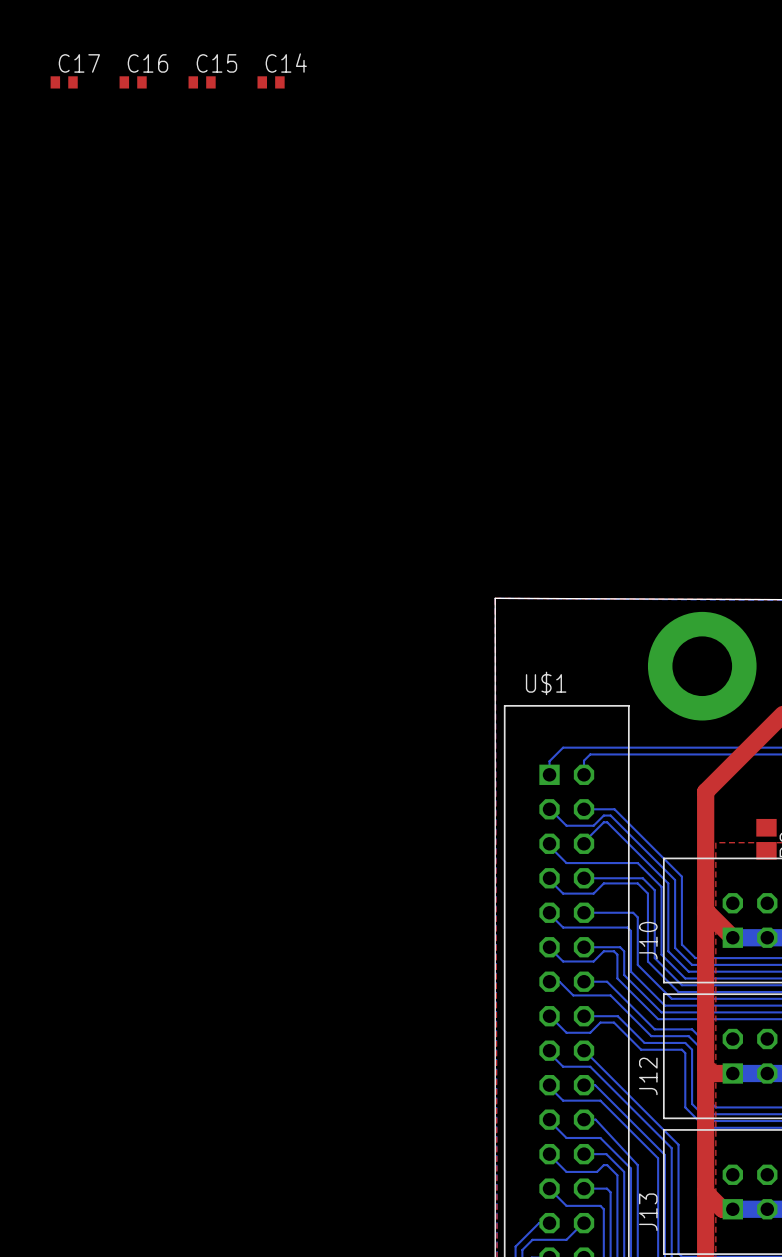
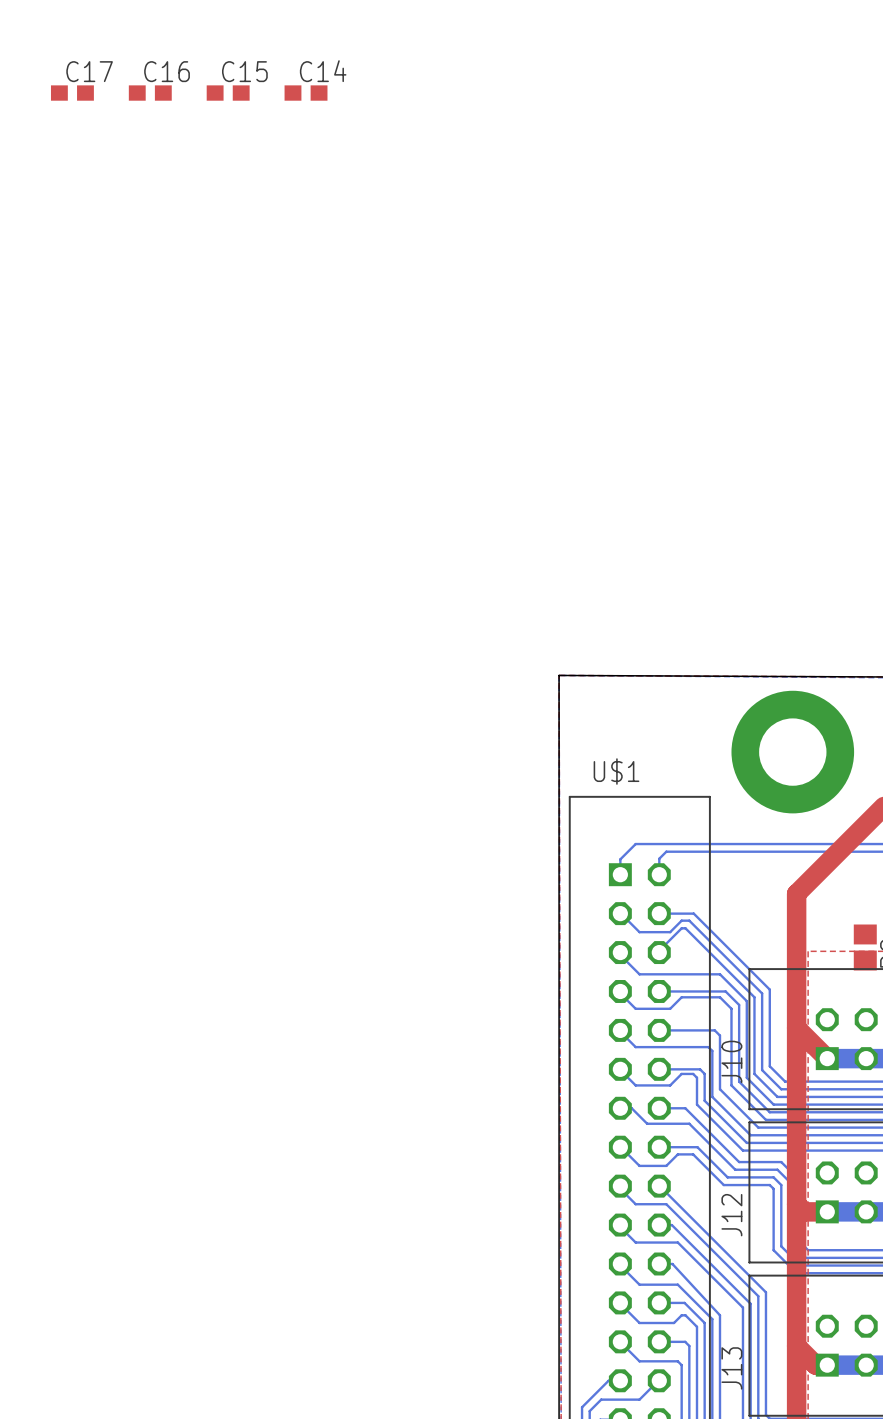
C17 footprint: [50, 76, 78, 89] -> [50, 85, 94, 101]
C16 footprint: [119, 76, 147, 89] -> [128, 85, 172, 101]
C15 footprint: [188, 76, 216, 89] -> [206, 85, 250, 101]
C14 footprint: [257, 76, 285, 89] -> [284, 85, 328, 101]

